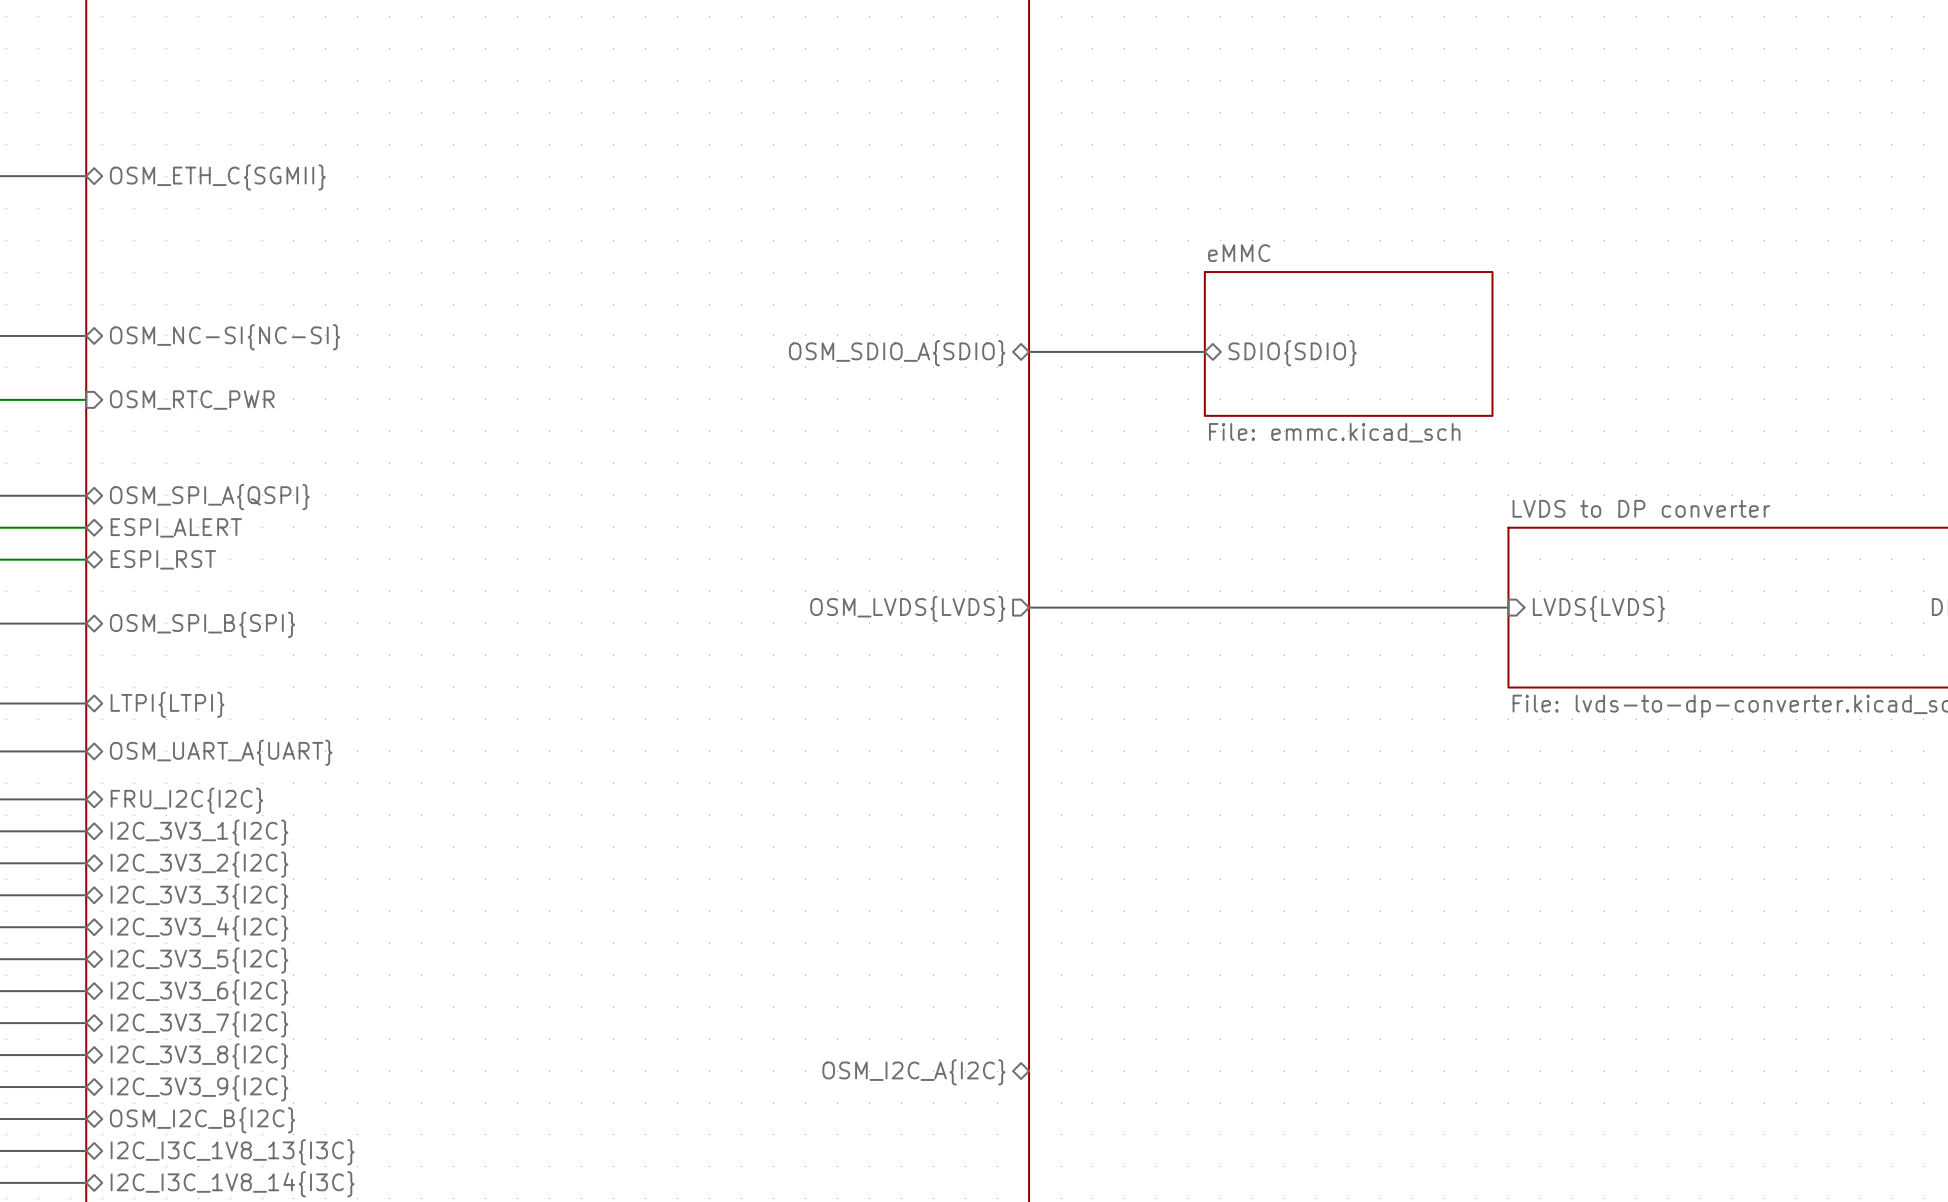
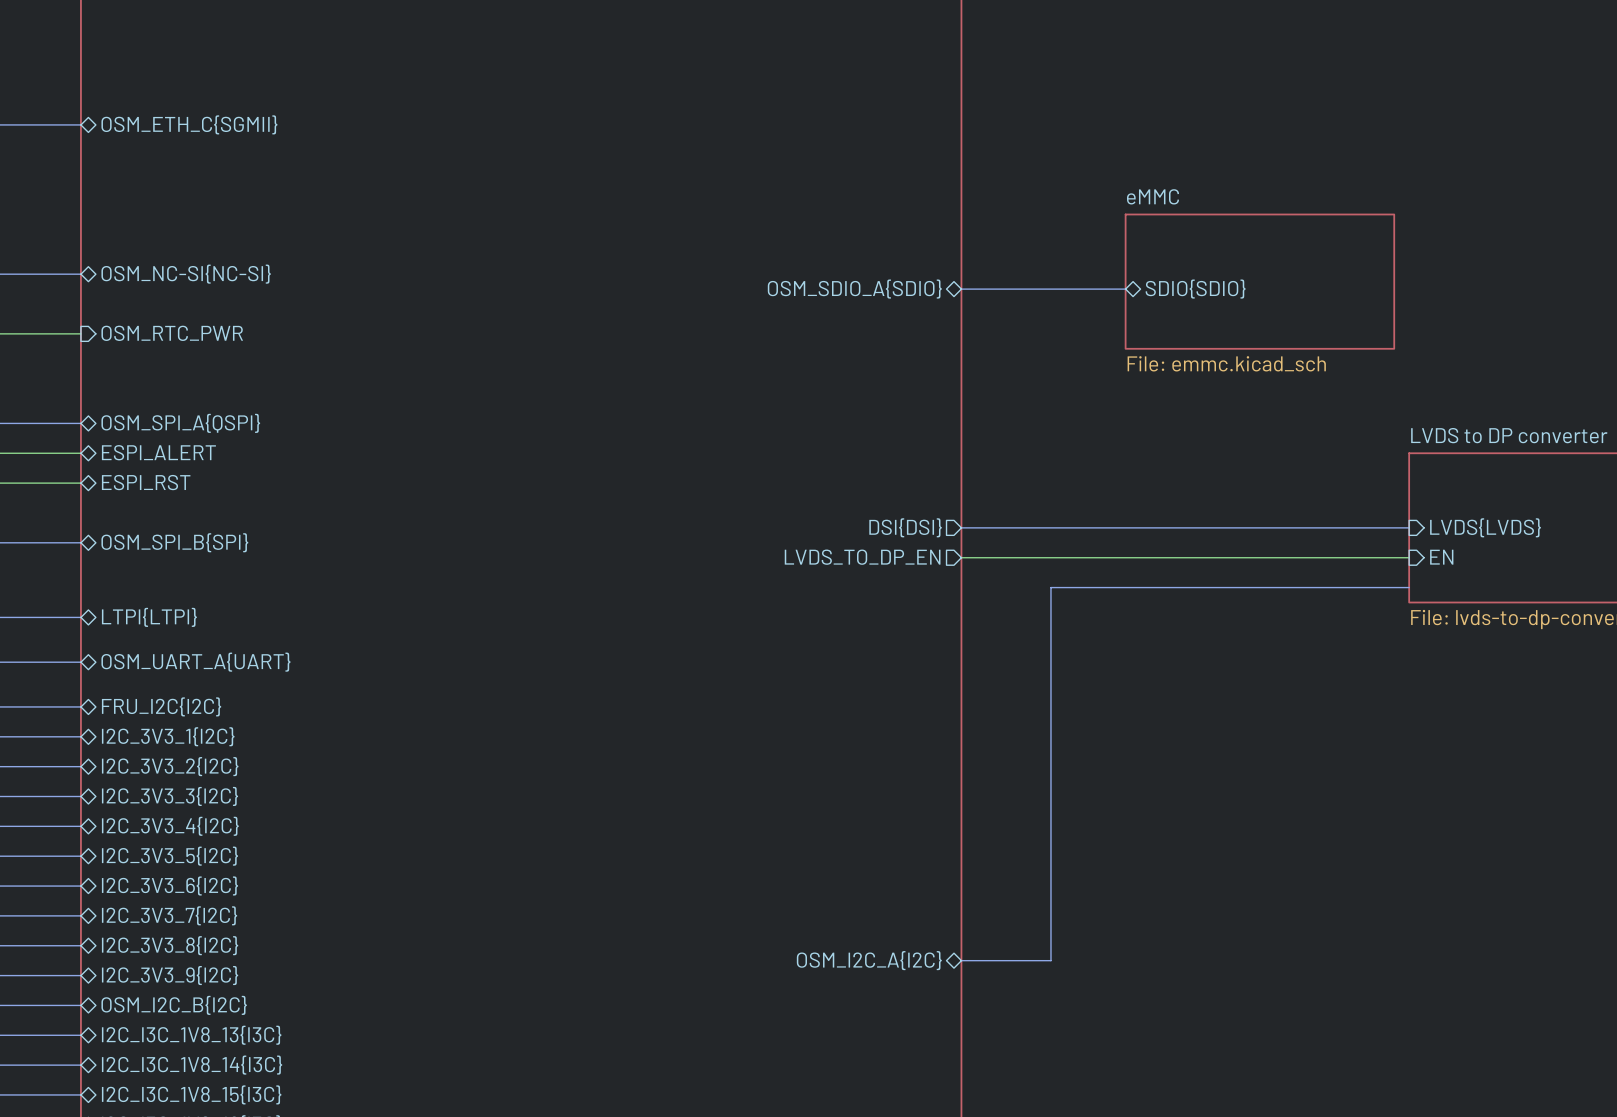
sheet pin: OSM_LVDS{LVDS} (907, 608) -> DSI{DSI} (905, 527)
sheet pin: none -> EN (1441, 557)
sheet pin: none -> LVDS_TO_DP_EN (862, 557)
wire: none -> (961, 557) (1409, 557)
bus: none -> (1409, 587) (1050, 587) (1050, 960) (961, 960)

